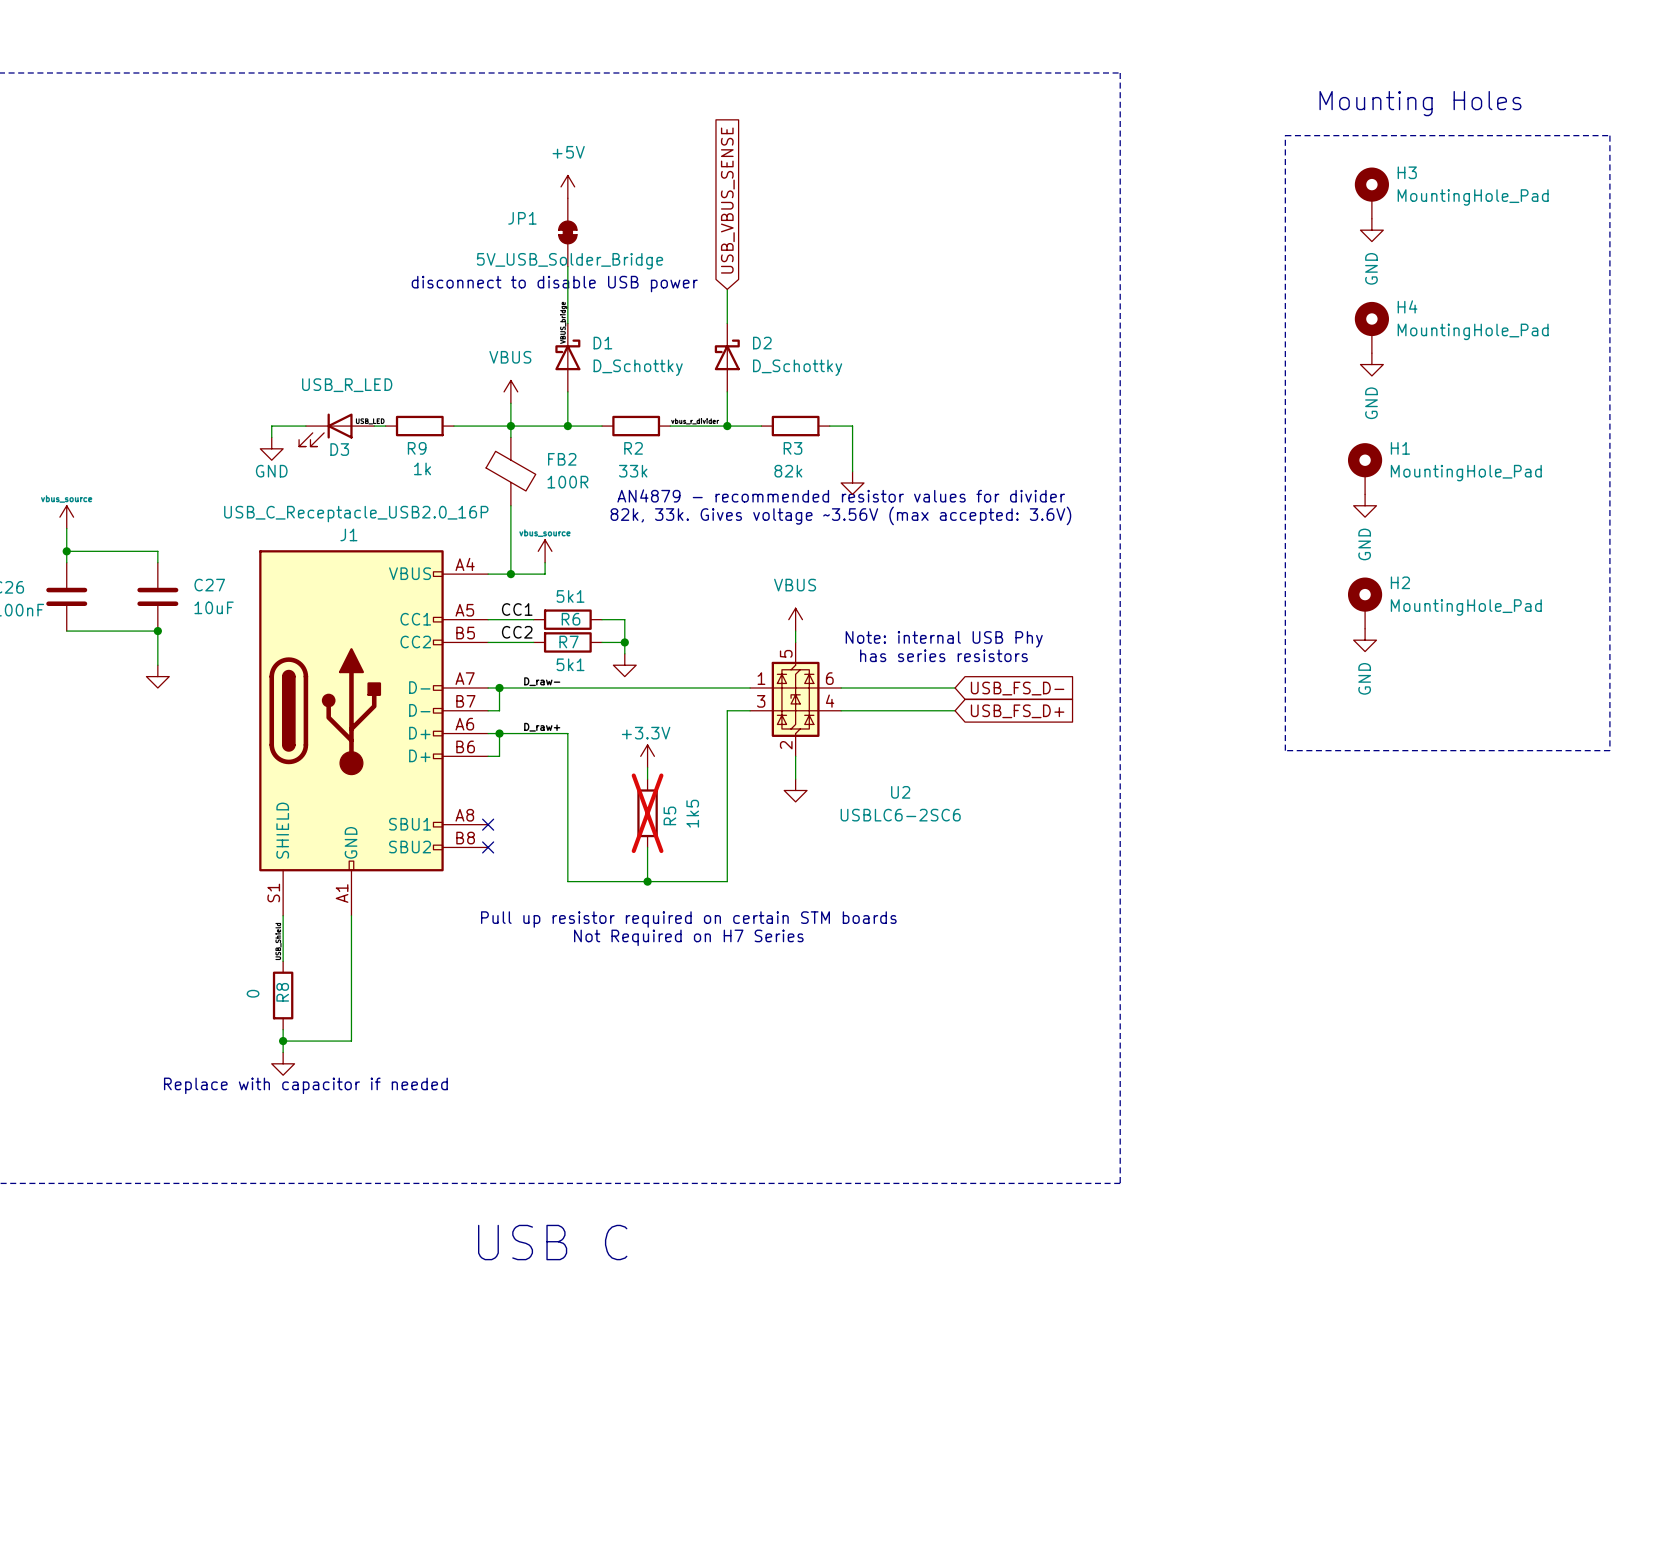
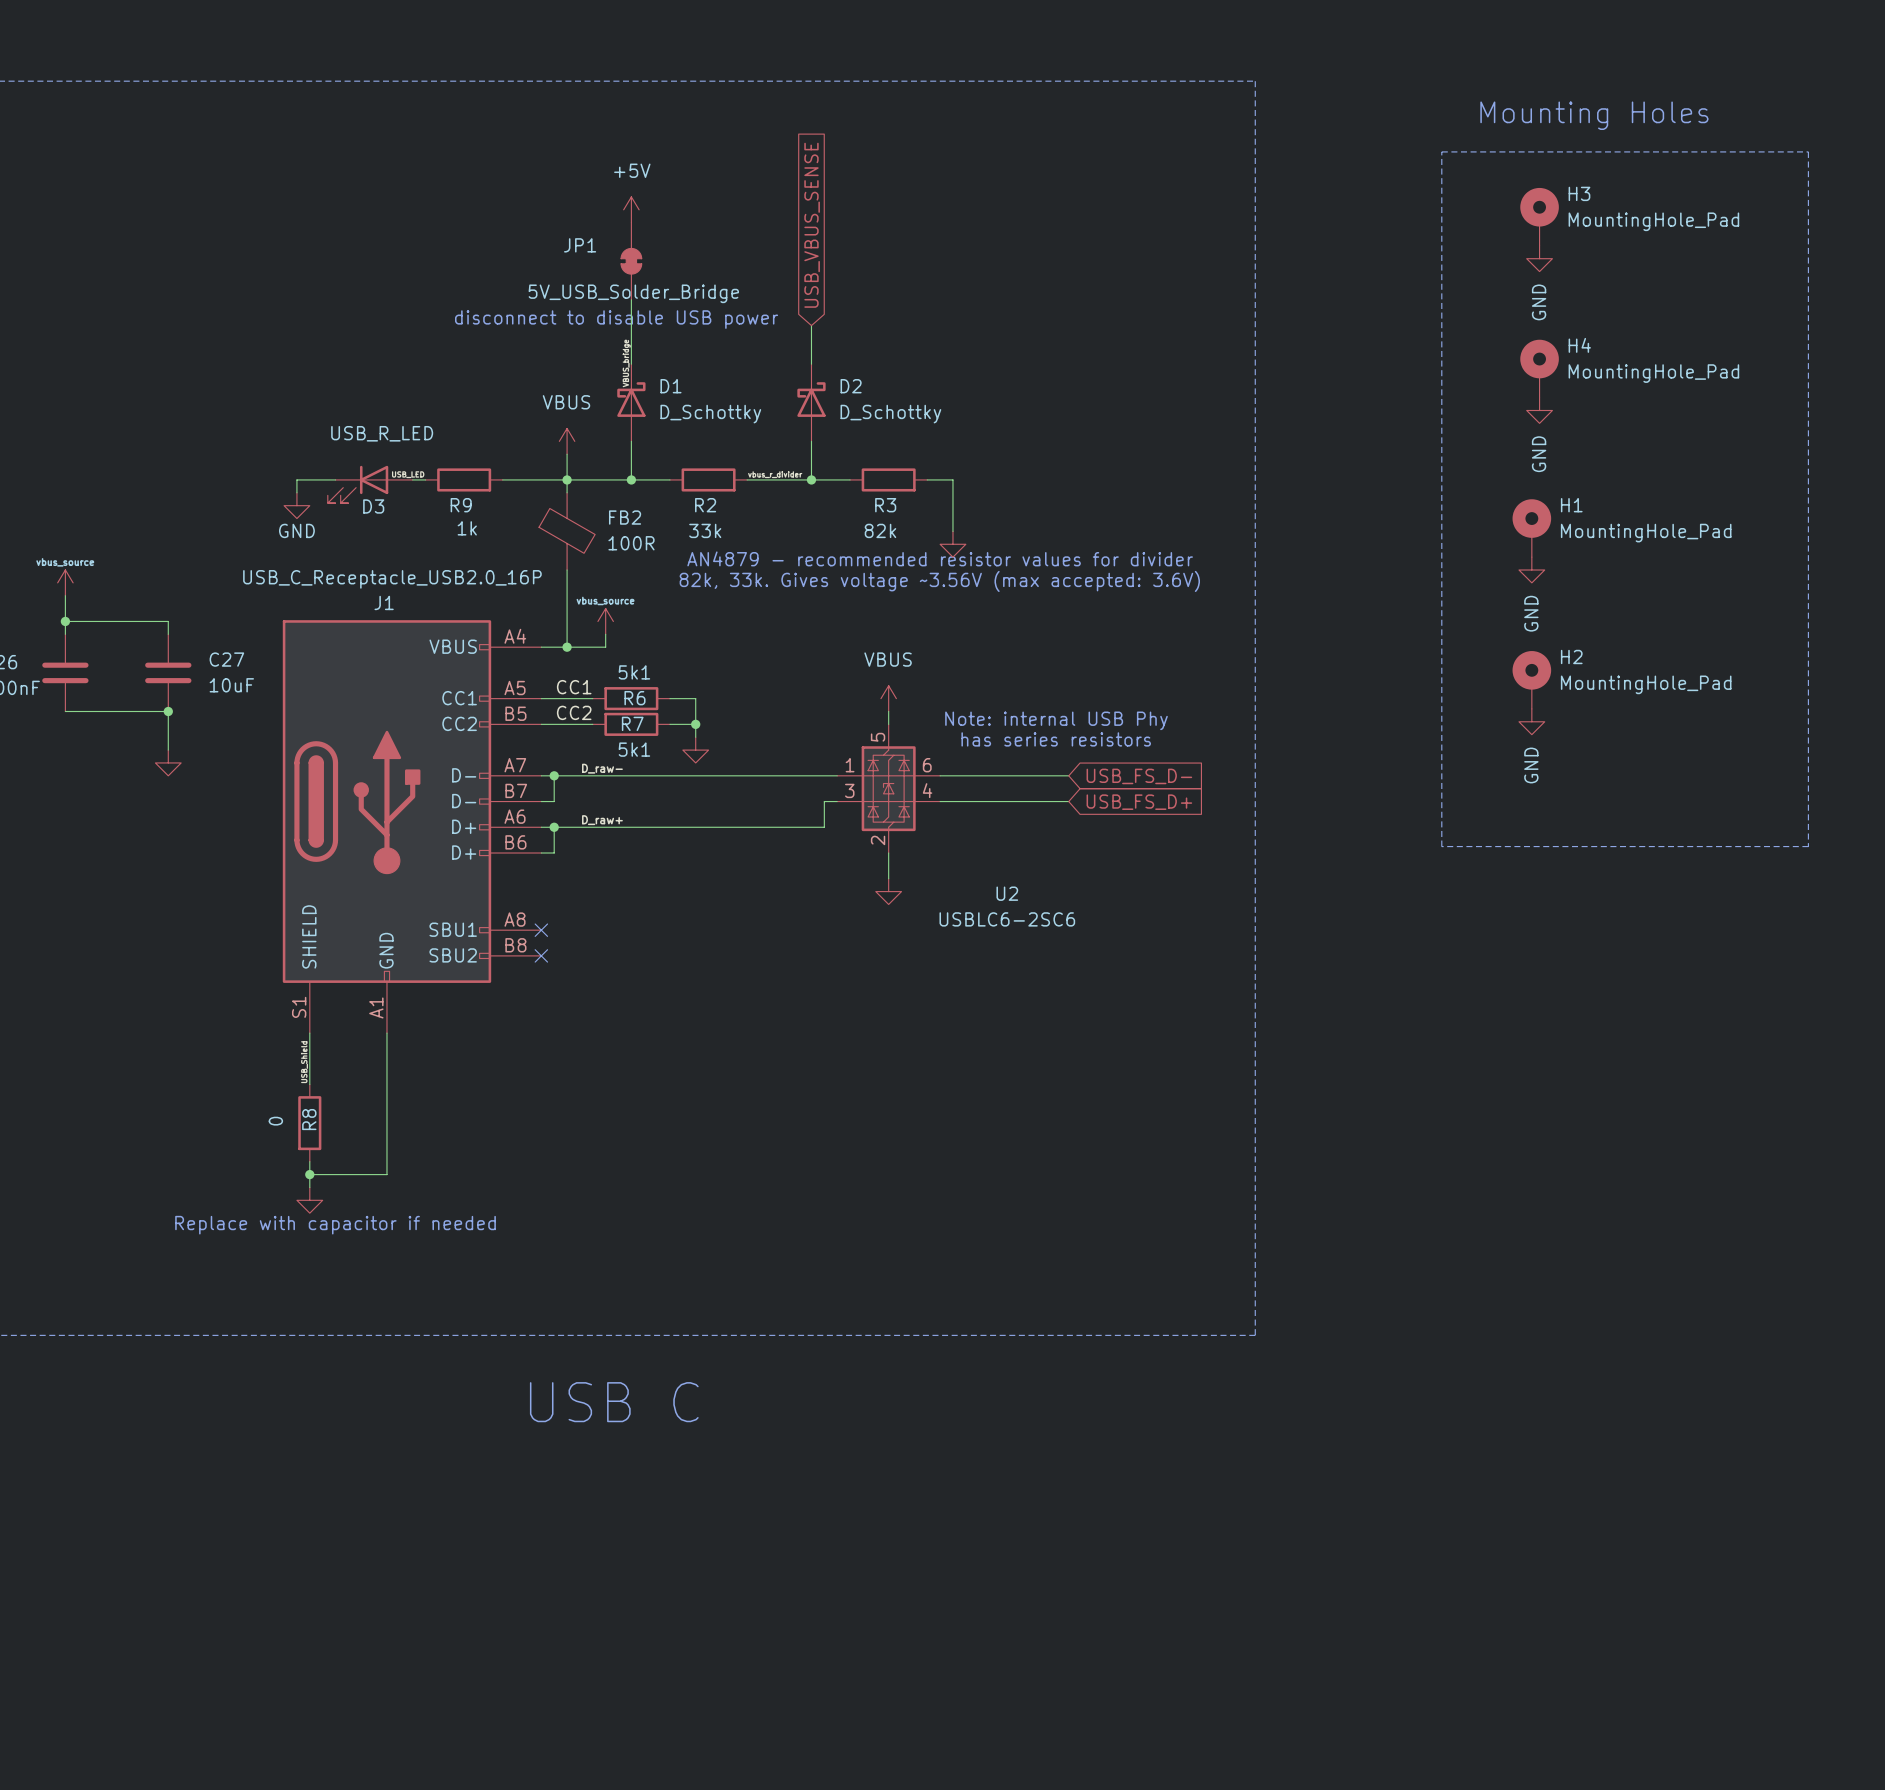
wire: (738, 710) (727, 710) (727, 881) (567, 881) (567, 733) -> (824, 801) (824, 827) (631, 827)
power symbol: +3.3V (647, 756) -> none
wire: (647, 767) (647, 779) -> none
R5: 1k5 (647, 813) -> none
wire: (647, 847) (647, 881) -> none
junction: (647, 881) -> none
text: Pull up resistor required on certain STM boards (688, 919) -> none
text: Not Required on H7 Series (688, 937) -> none

